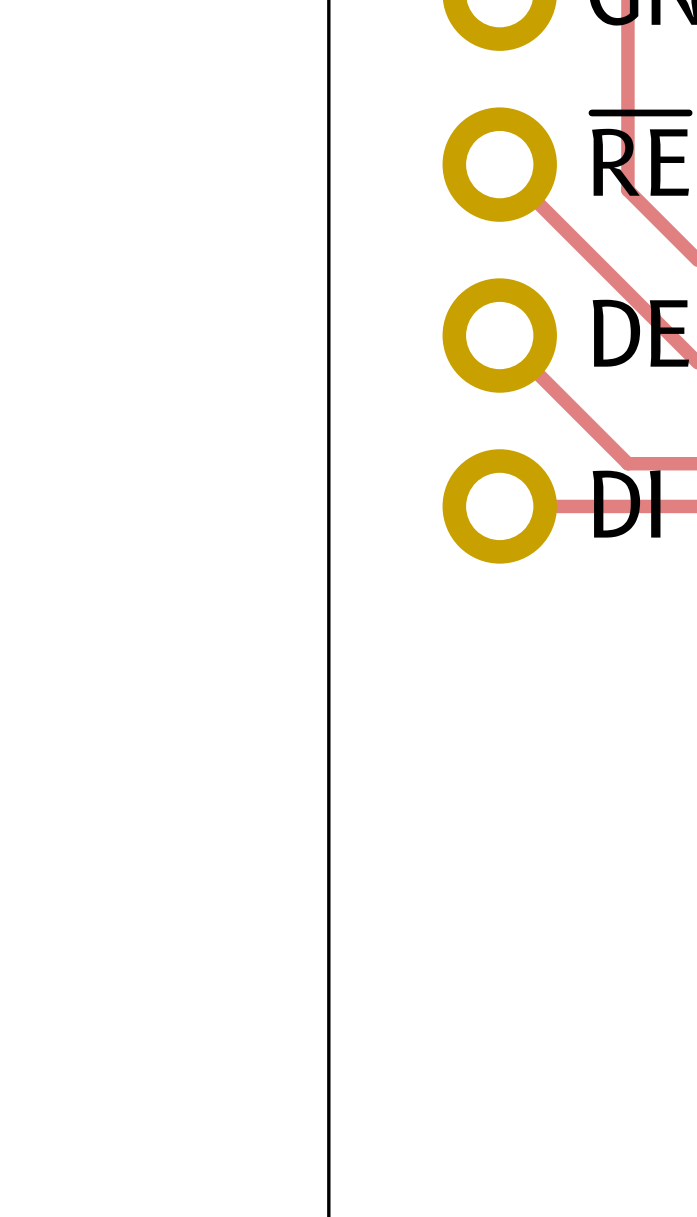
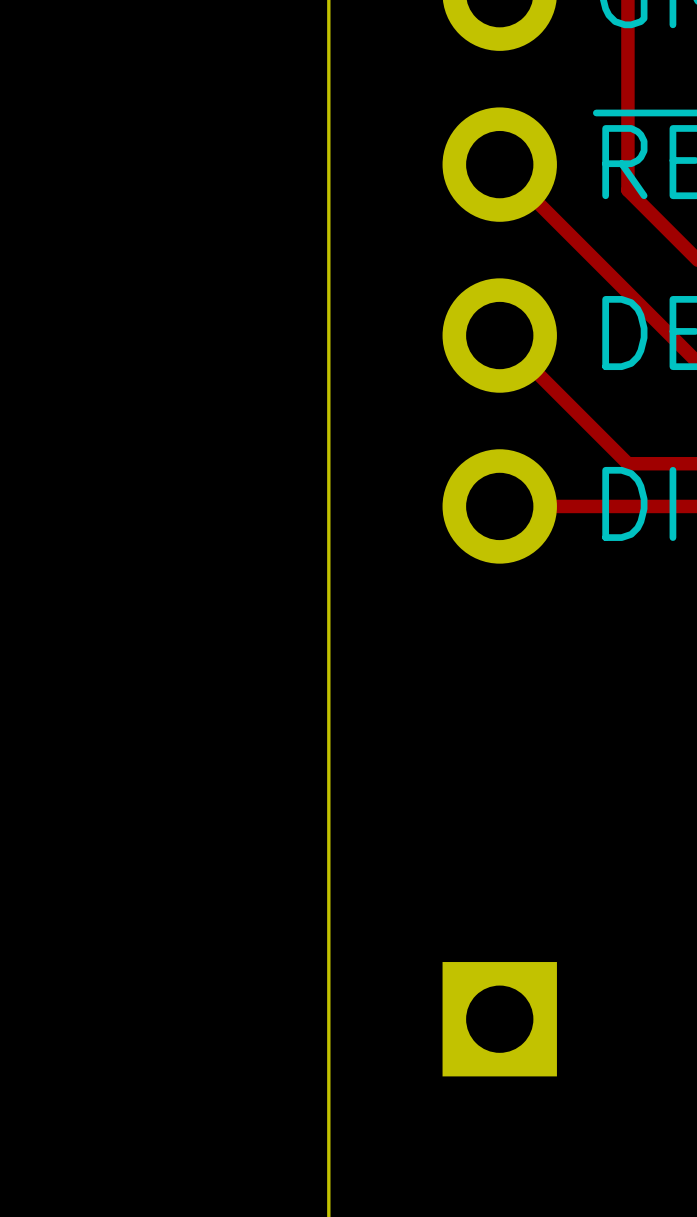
part: none -> (499, 1019)

